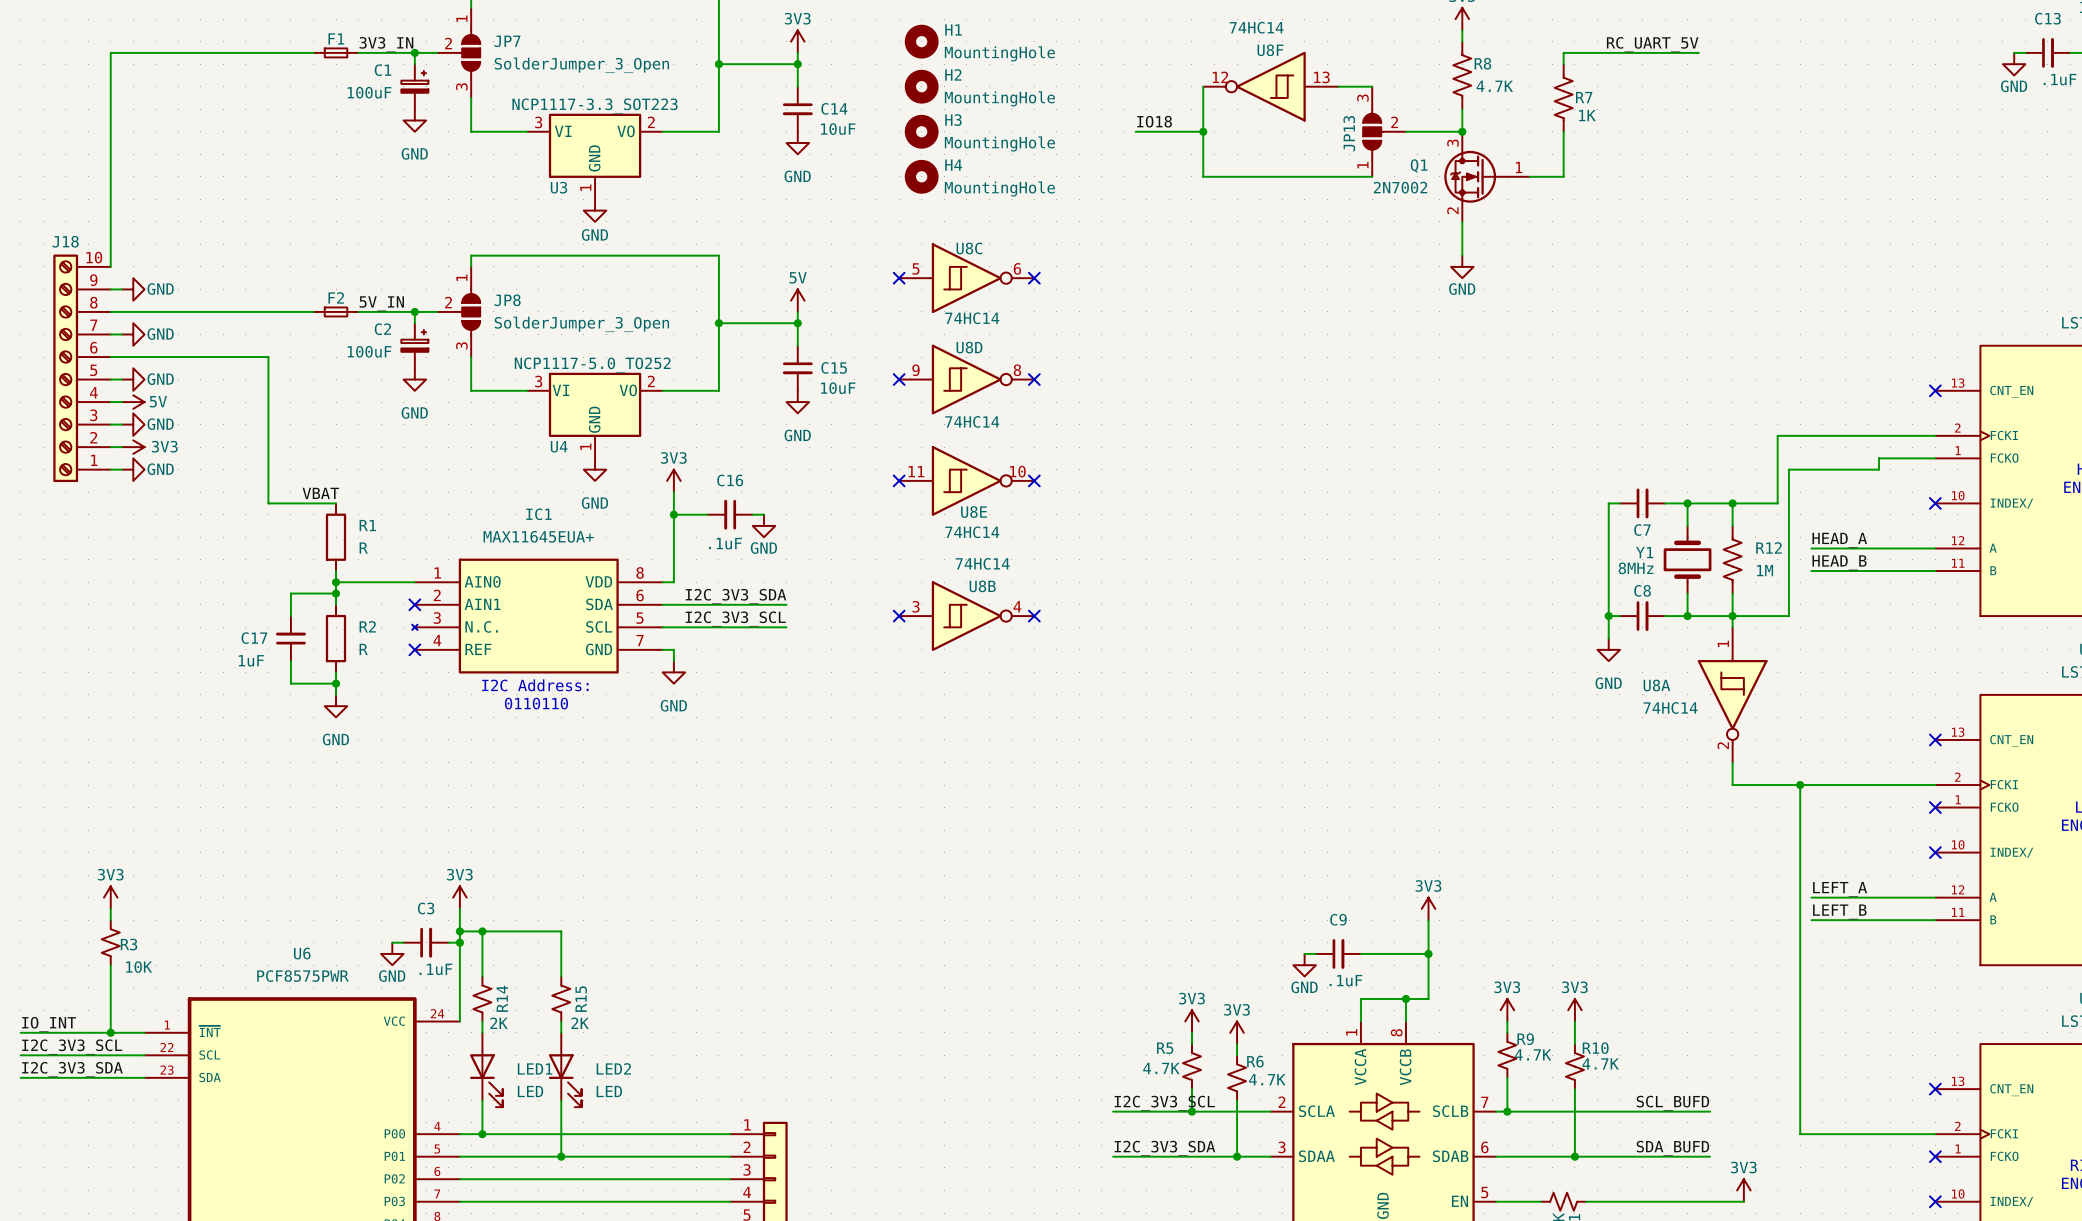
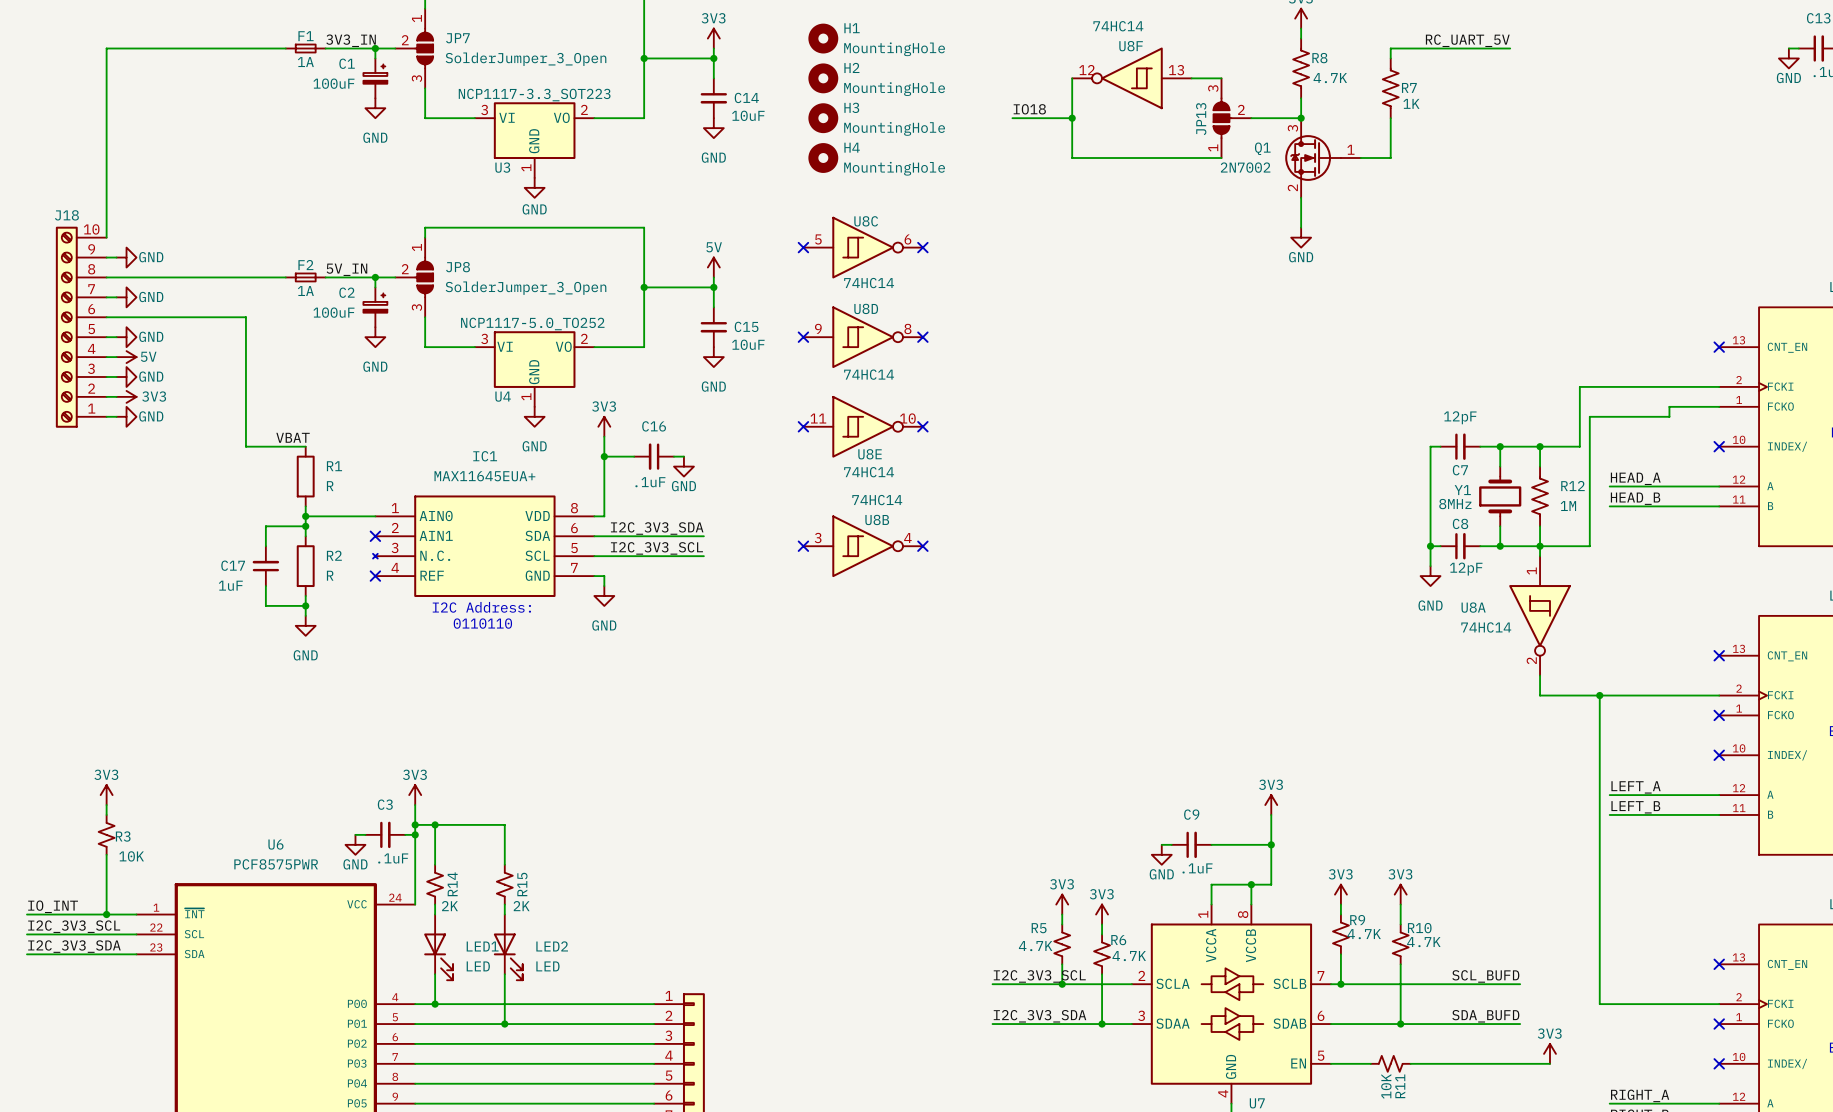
F1 value: none -> 1A (305, 62)
F2 value: none -> 1A (305, 291)
C7 value: none -> 12pF (1460, 417)
C8 value: none -> 12pF (1466, 569)

